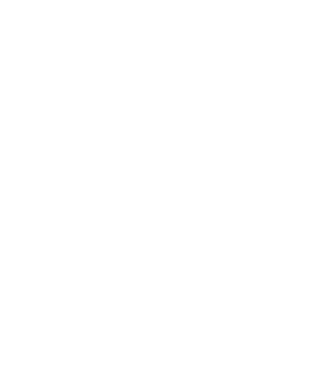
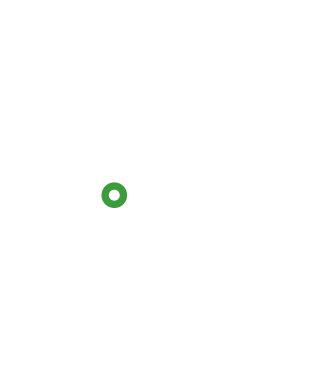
via: none -> (114, 195)

